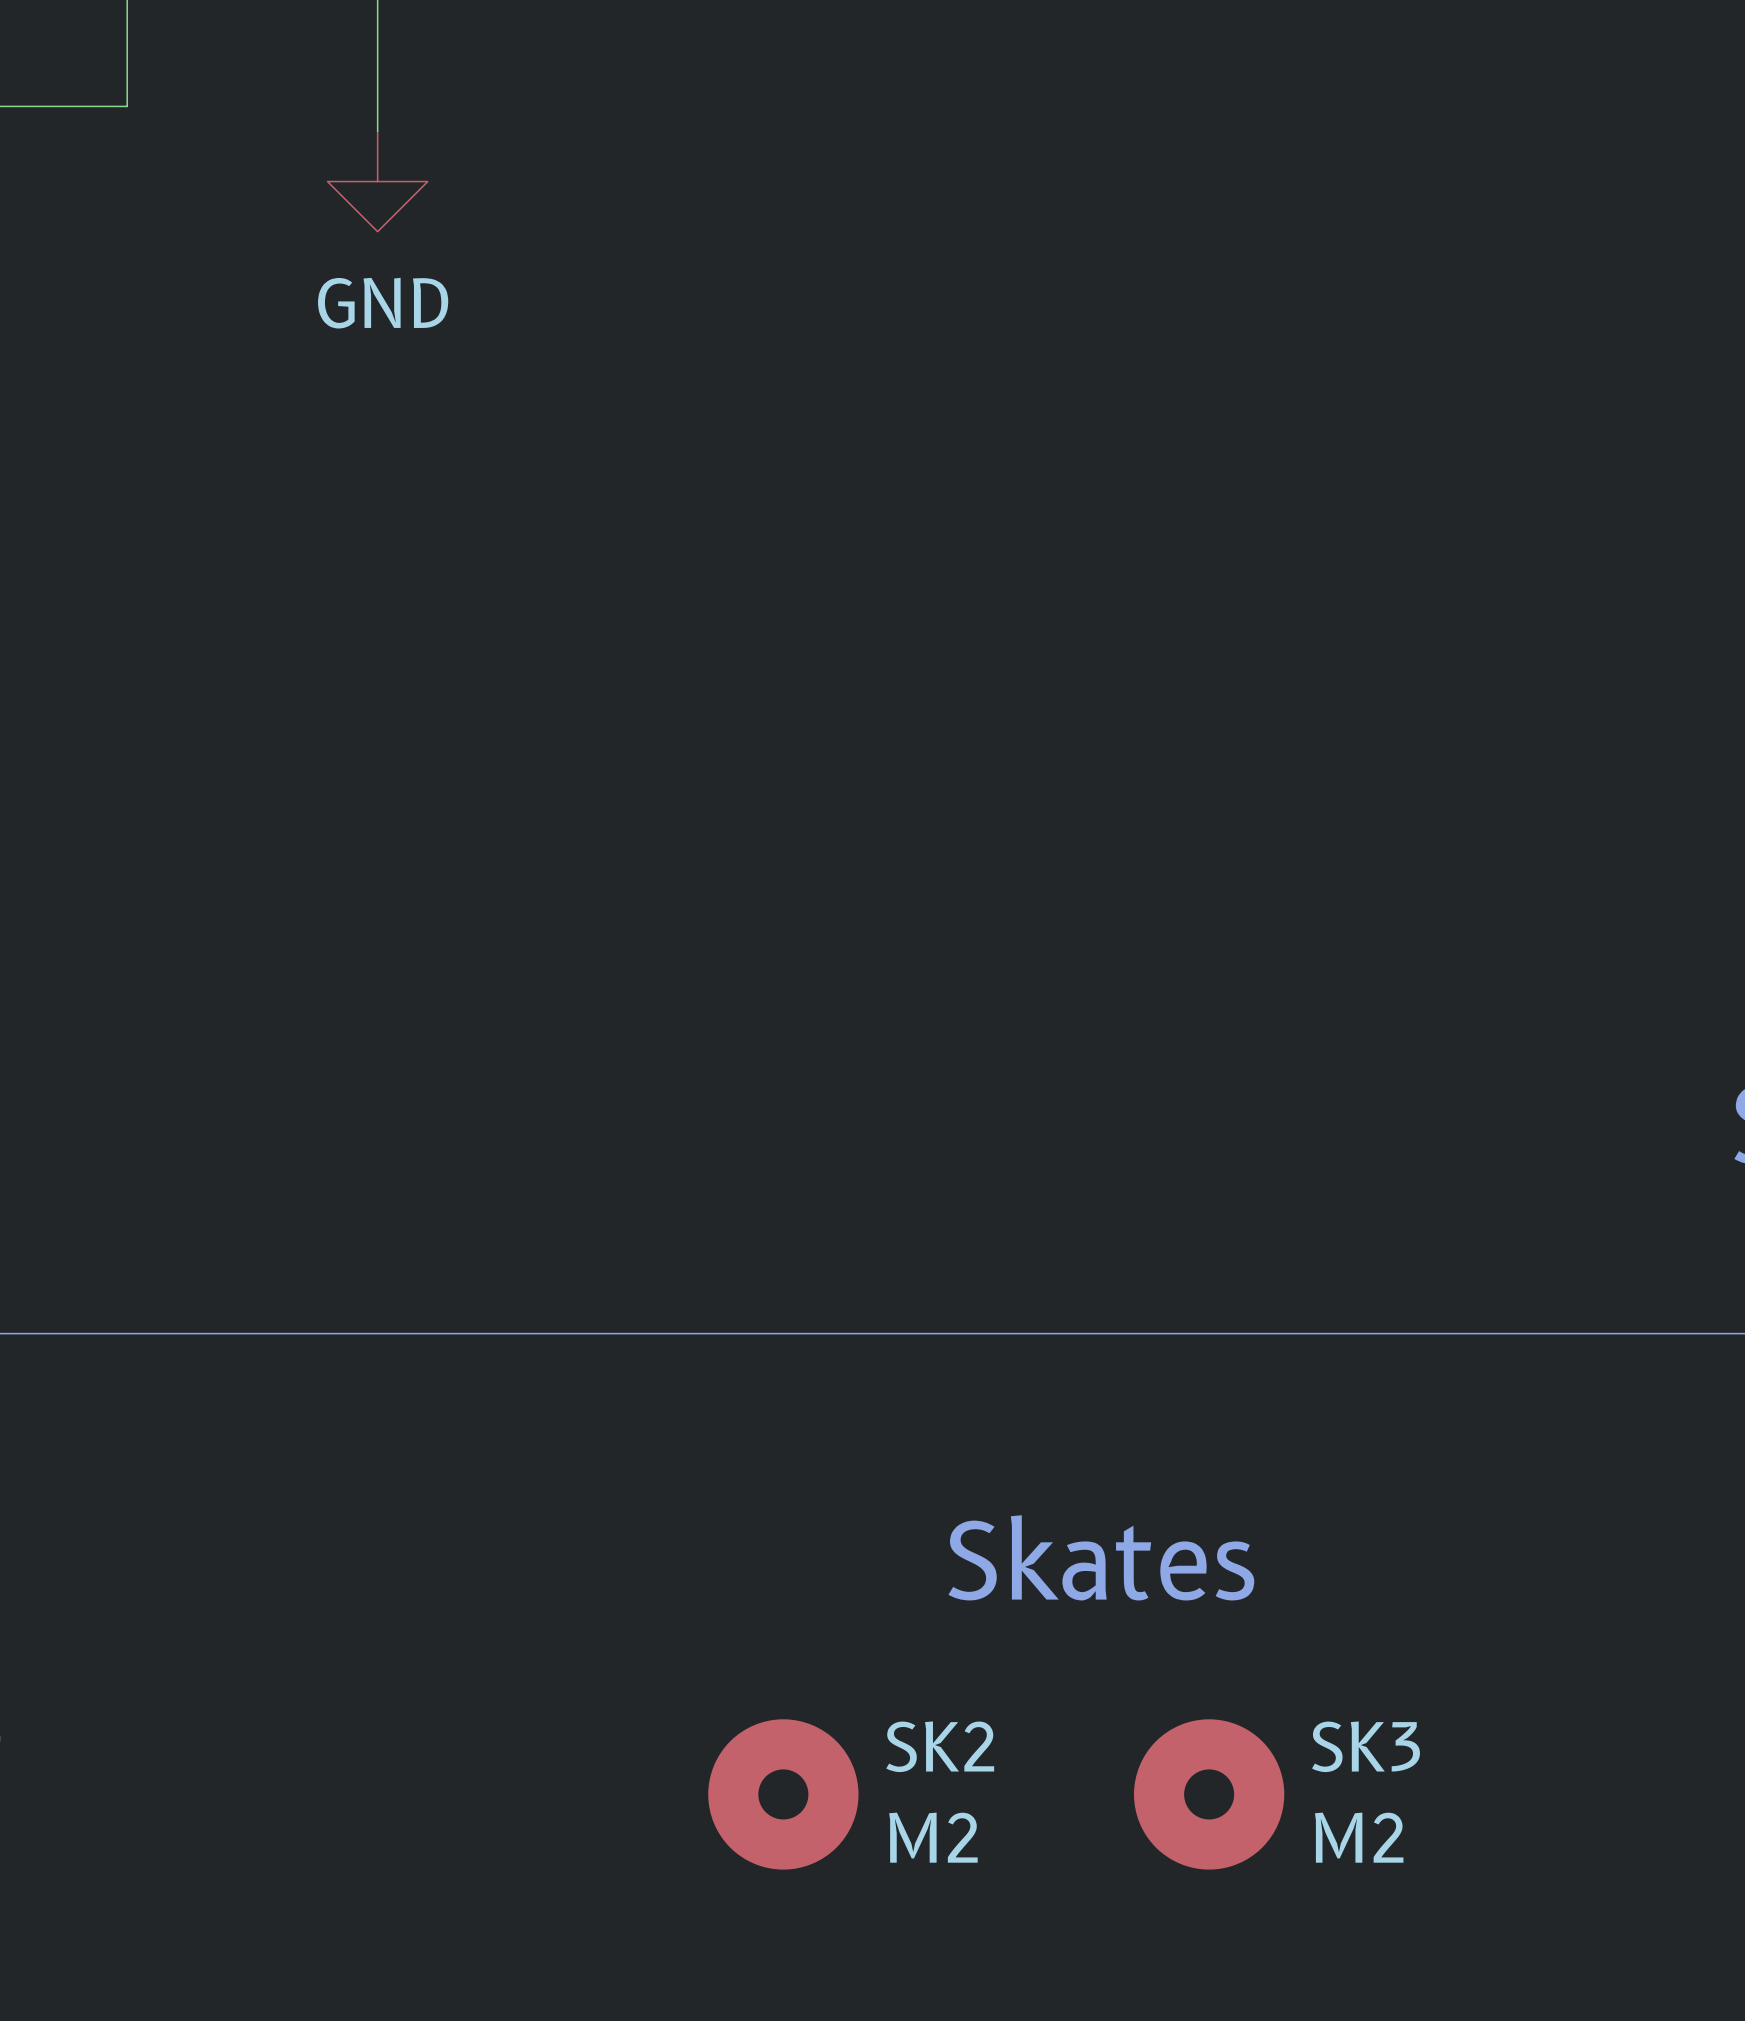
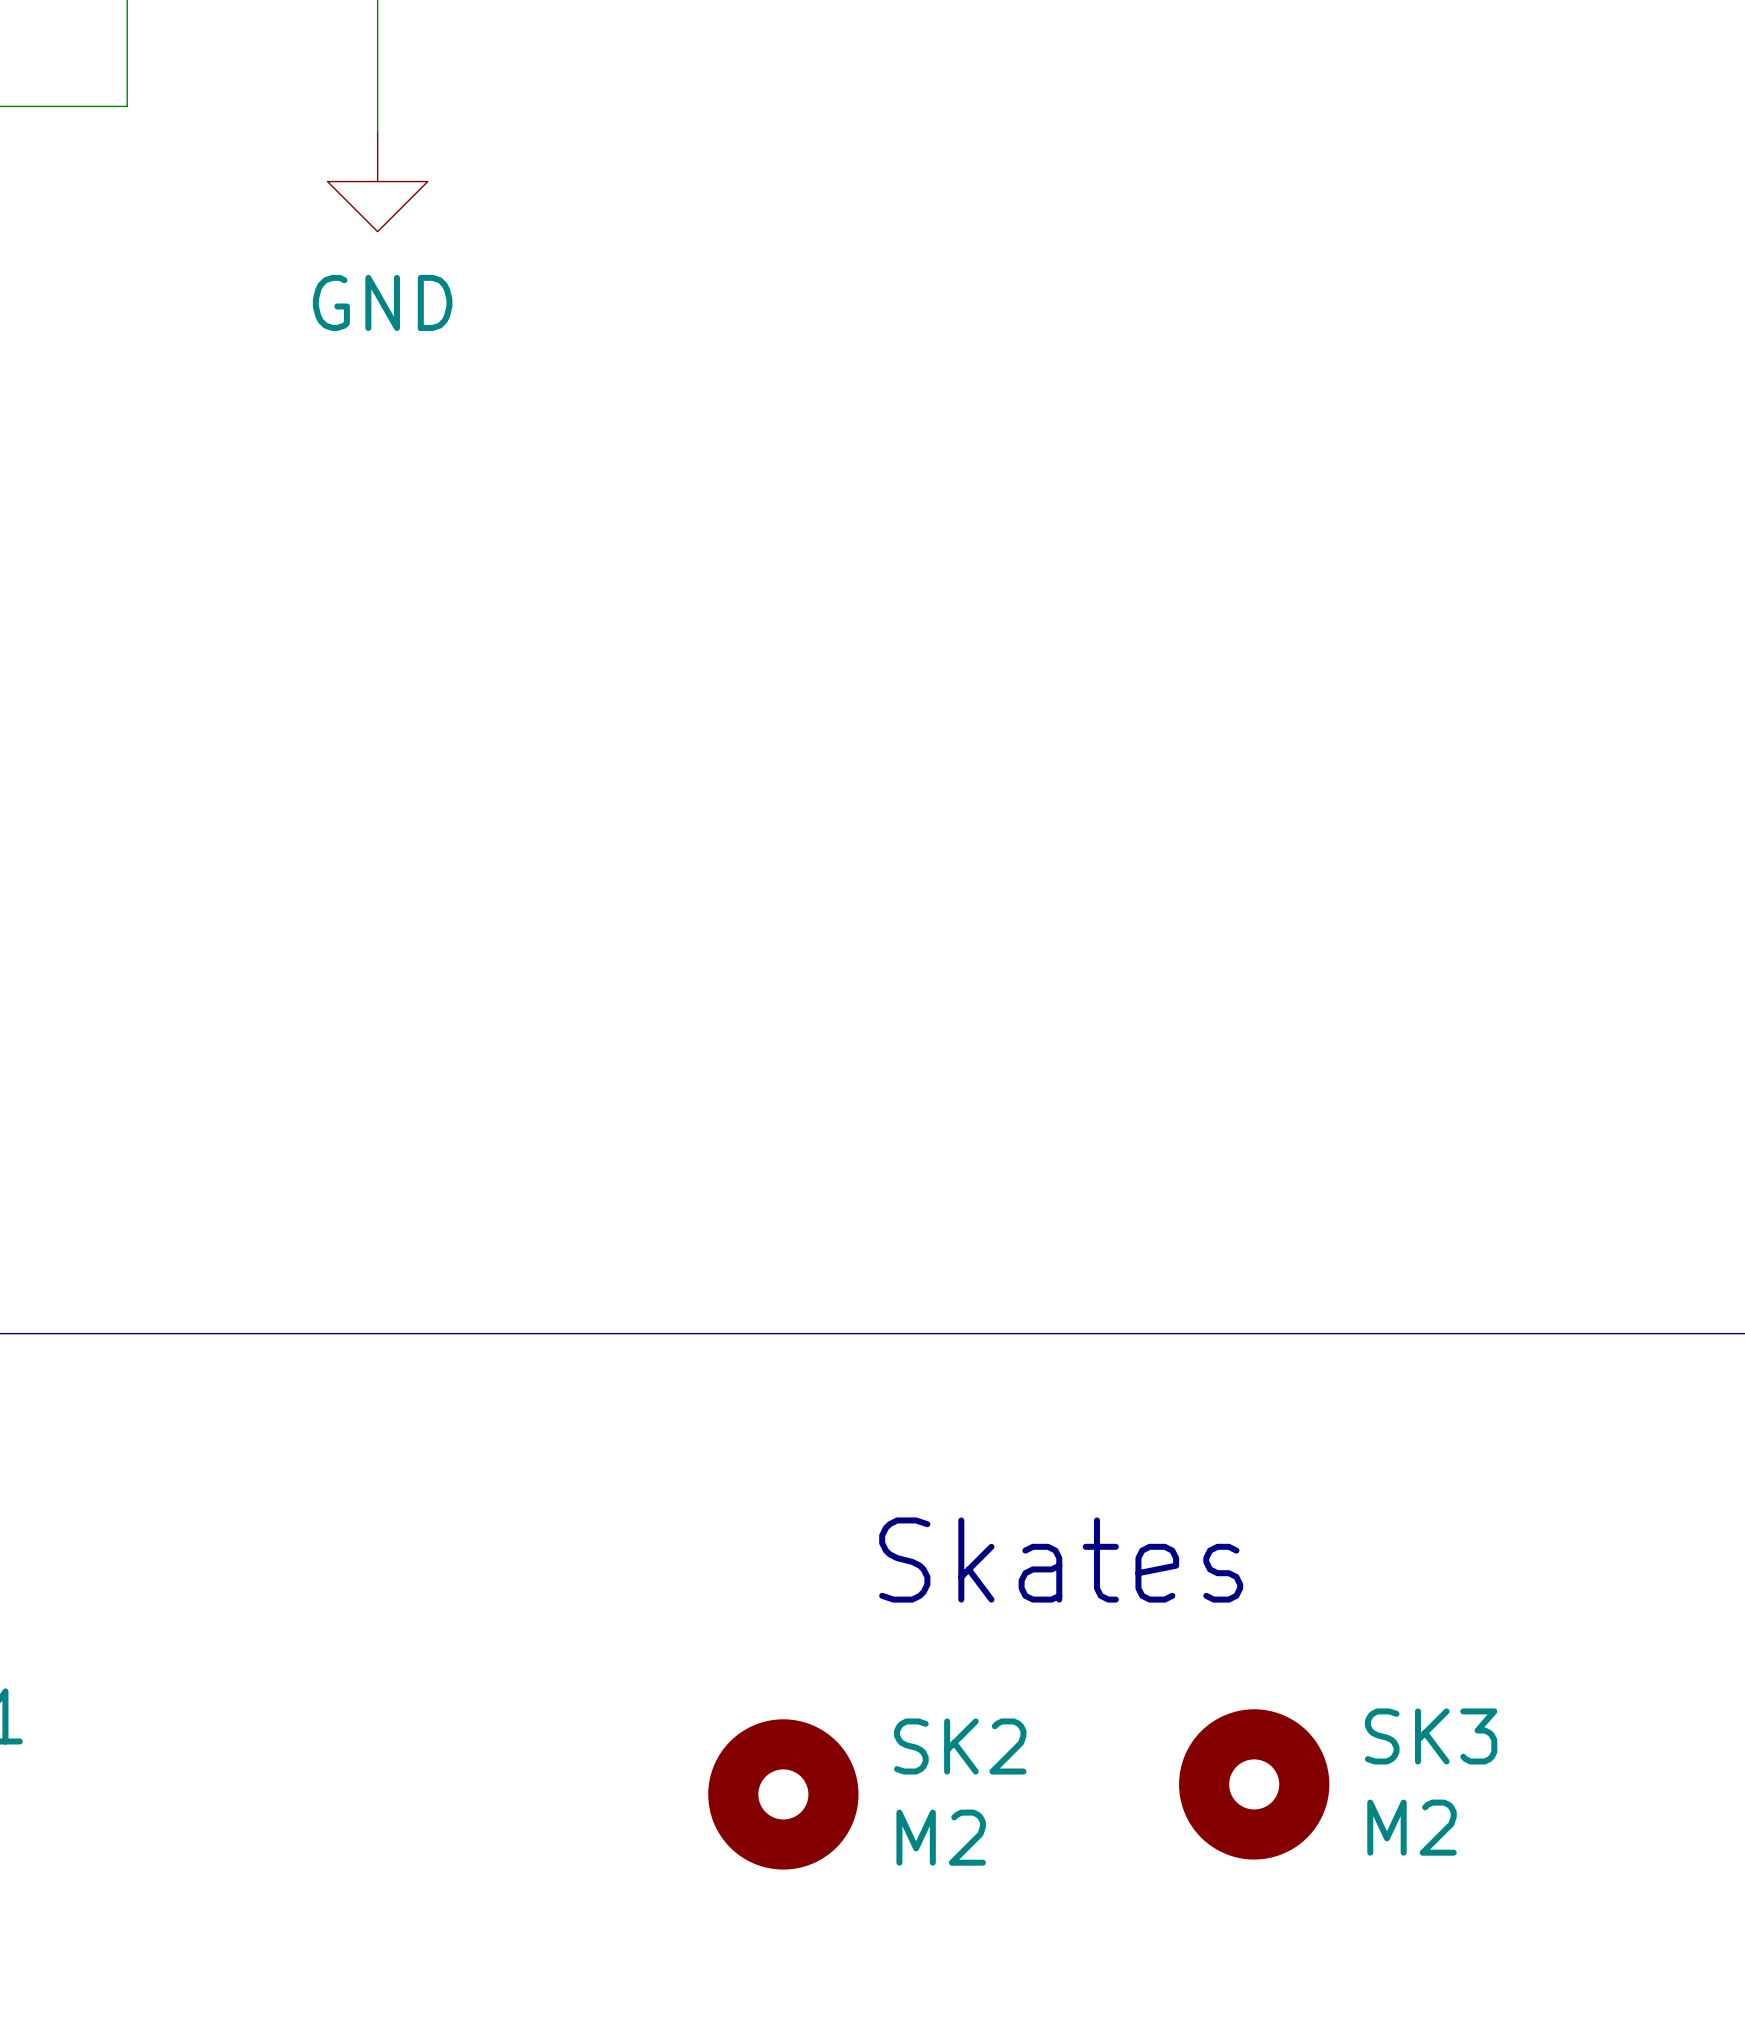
SK3 position: (1209, 1794) -> (1254, 1784)

